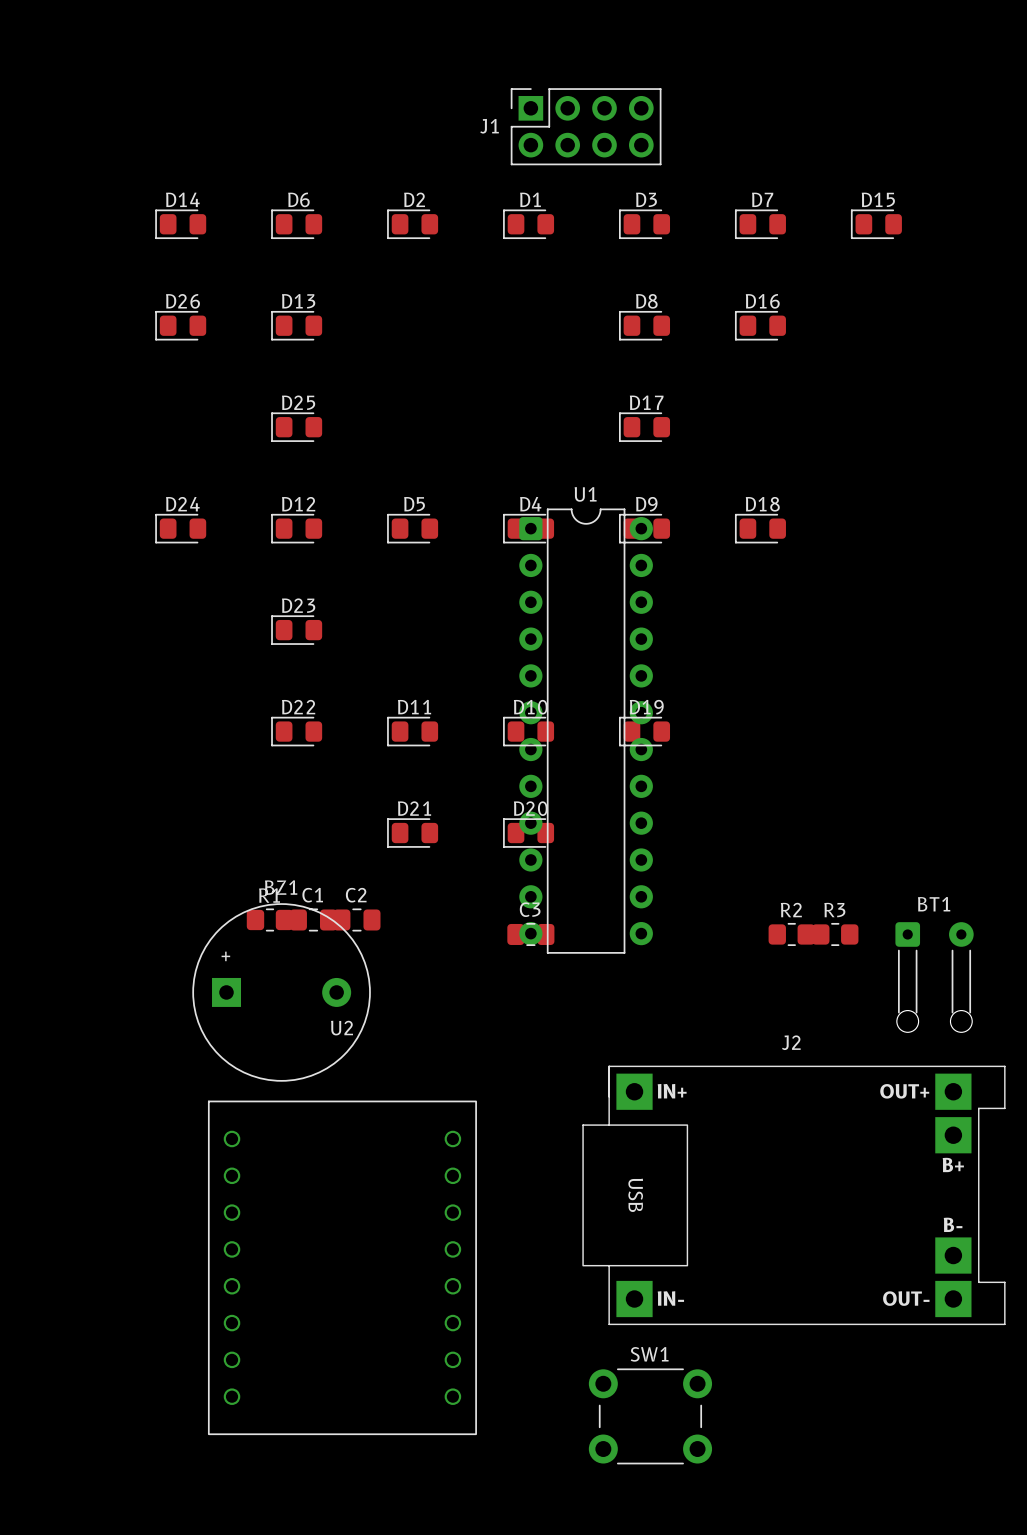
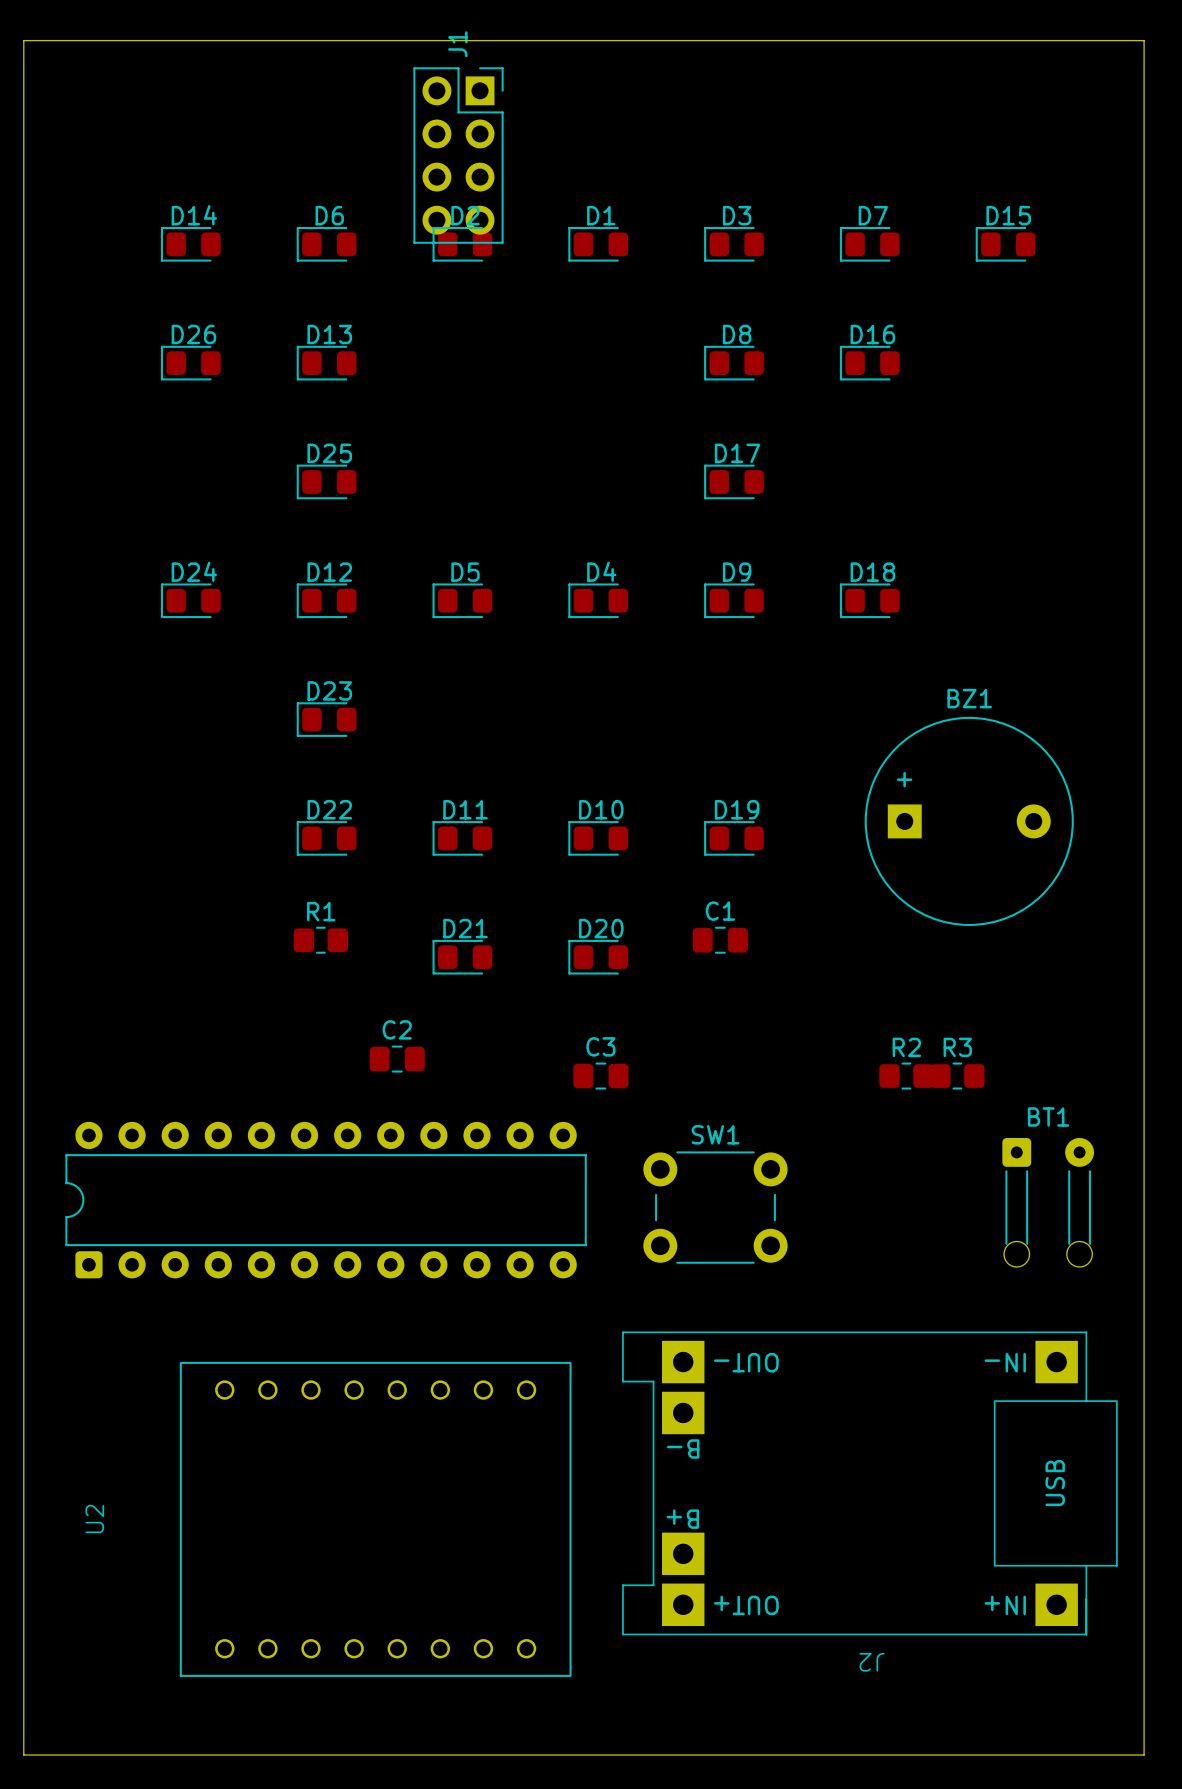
board edge: none -> (23, 40) (1144, 40) (1144, 1755) (23, 1755) (23, 40)
J1 rotation: 0° (586, 126) -> 90° clockwise (458, 155)
J1 position: (586, 126) -> (458, 155)
U1: (586, 731) -> none
R1 position: (269, 919) -> (320, 940)
C1 position: (313, 919) -> (720, 940)
BT1 position: (934, 977) -> (1048, 1202)
BZ1 position: (281, 992) -> (969, 821)
U2 name position: U2 (342, 1028) -> U2 (94, 1518)
part: none -> (326, 1200)
J2 rotation: 0° (793, 1195) -> 180° (869, 1483)
U2 rotation: 0° (342, 1267) -> 90° clockwise (375, 1519)
SW1 position: (650, 1416) -> (715, 1207)

